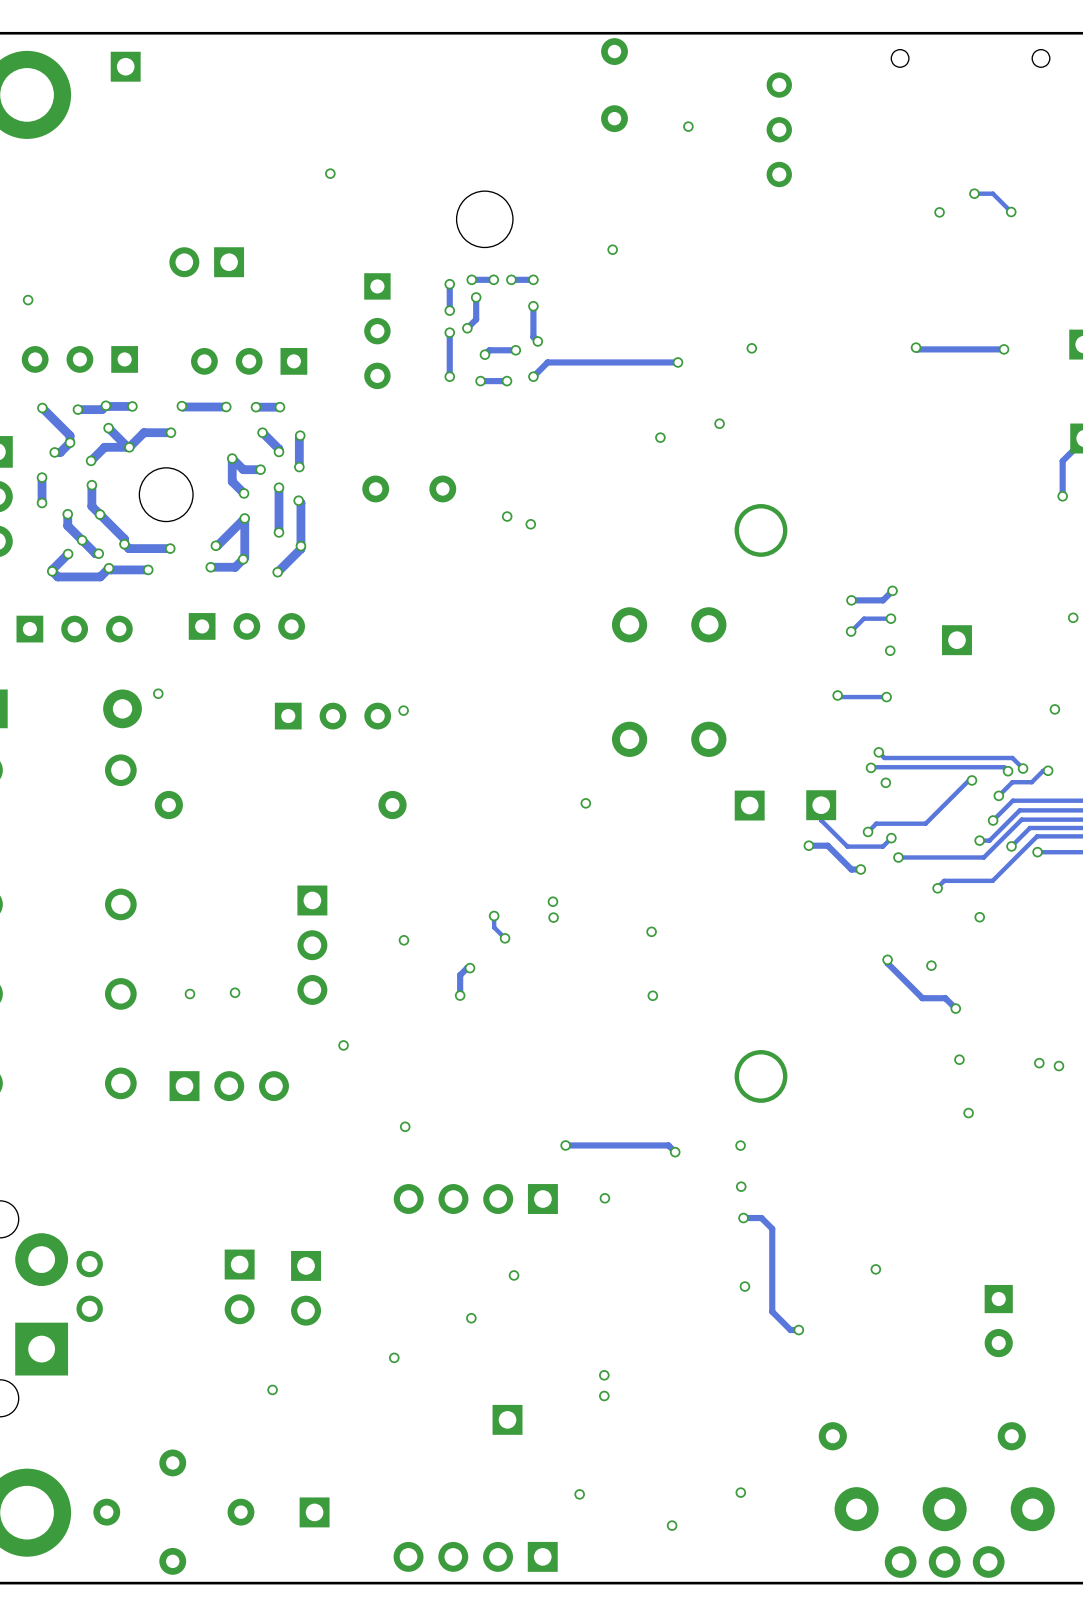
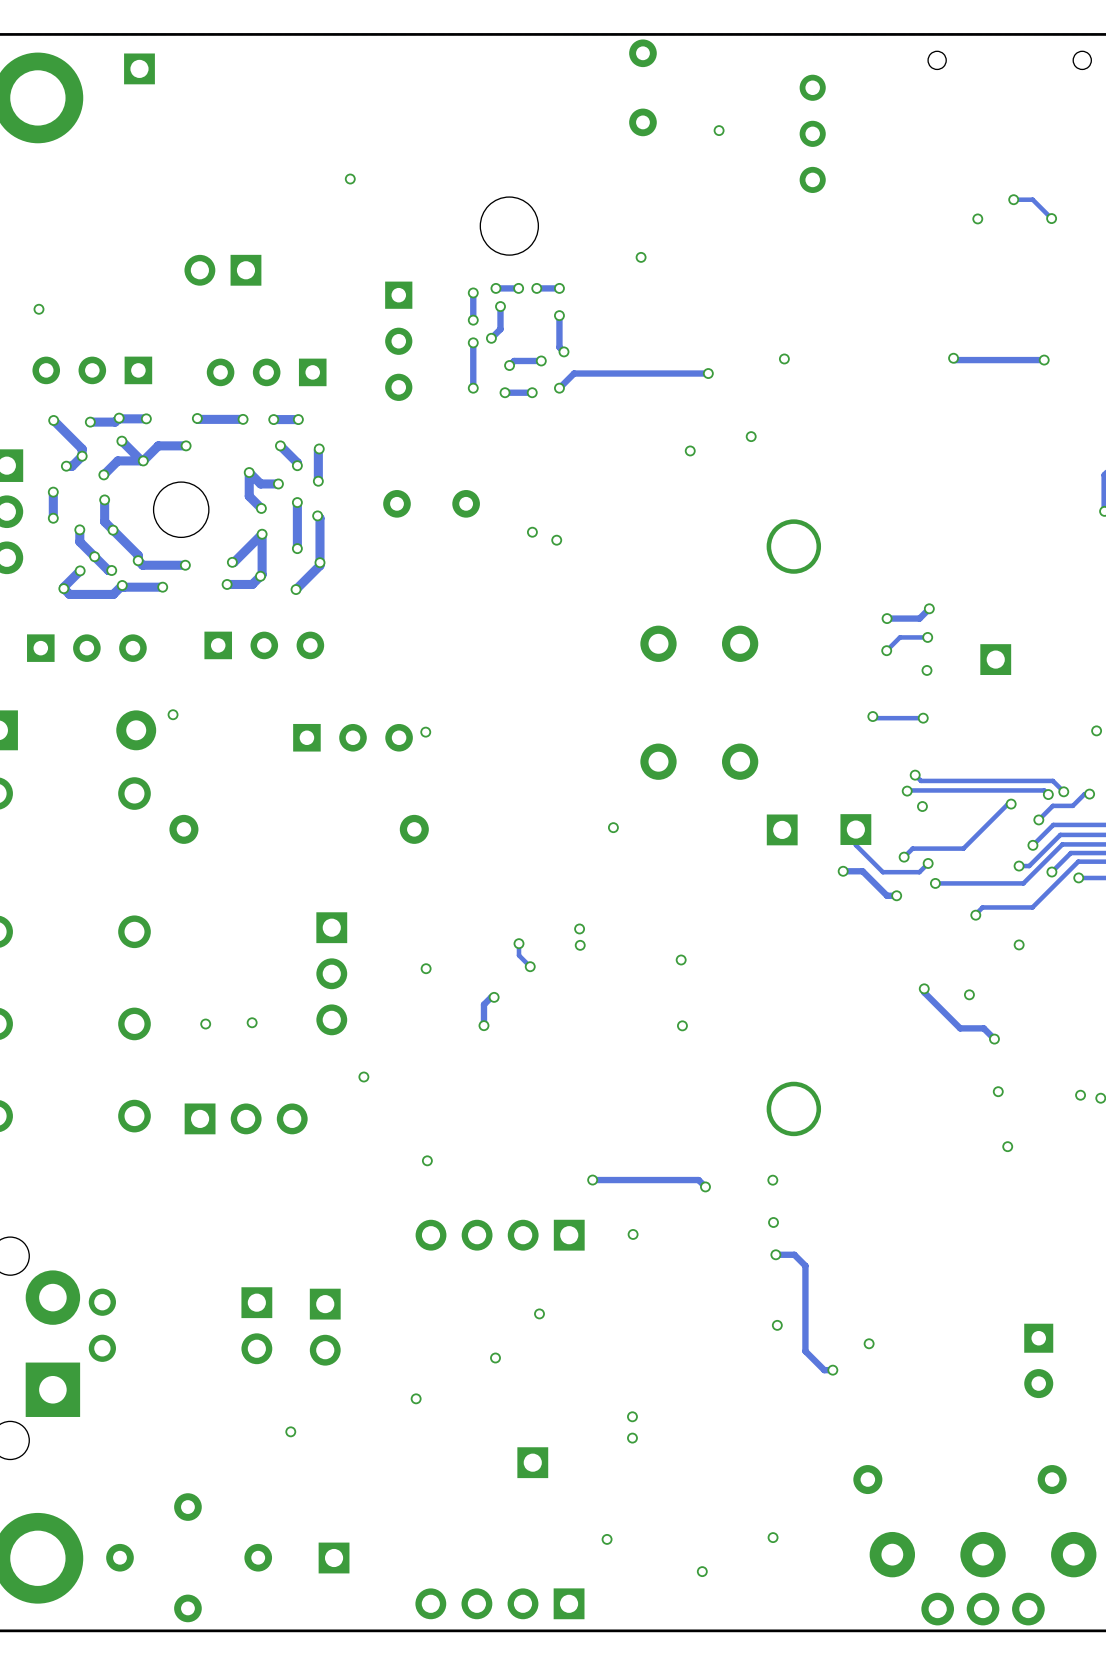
via position: (875, 1269) -> (869, 1343)

